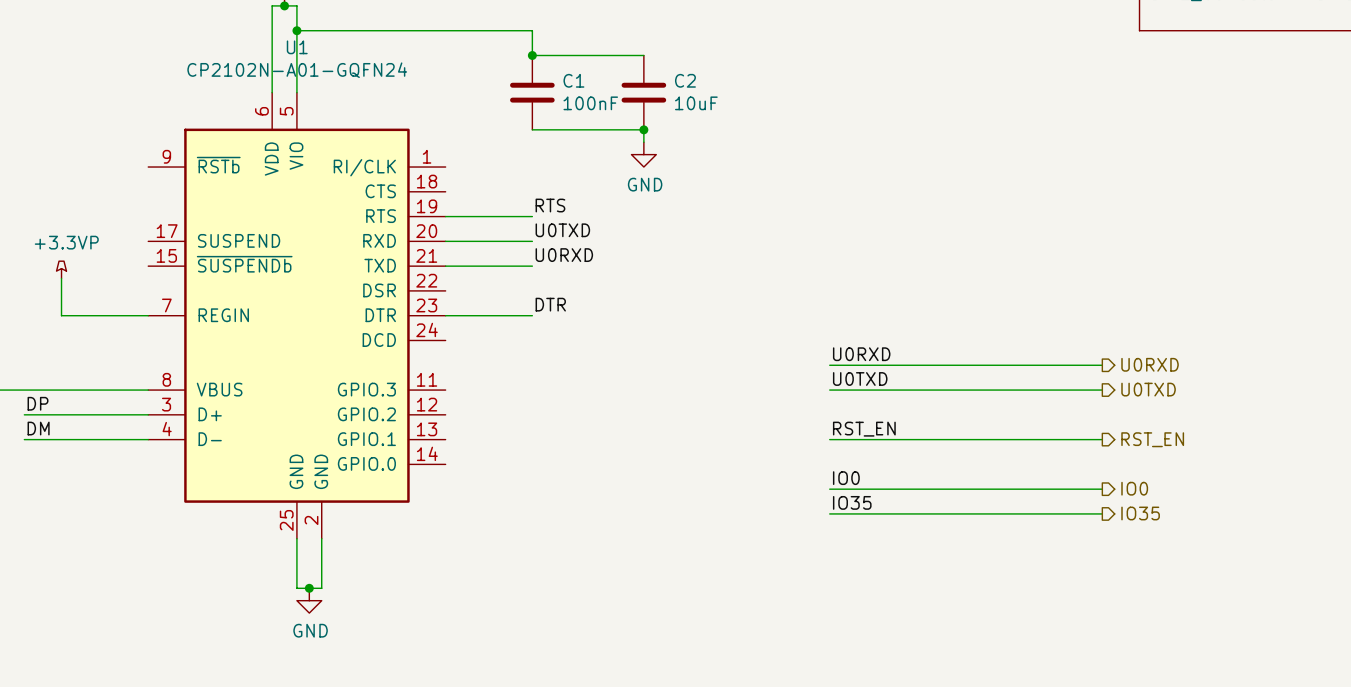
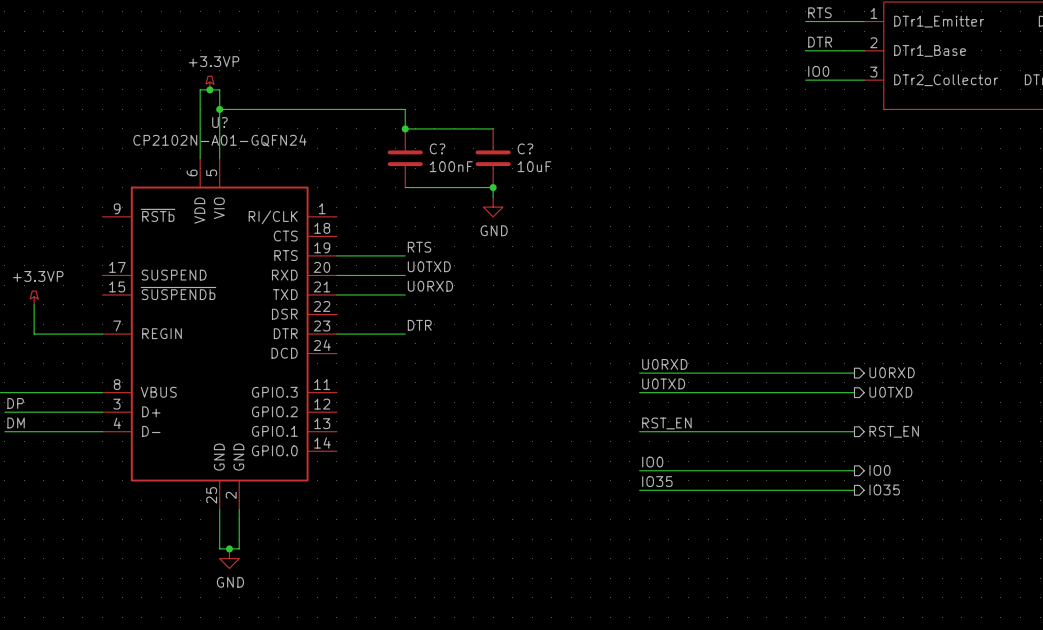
U1 name: U1 (297, 47) -> U? (219, 122)
C1 name: C1 (573, 80) -> C? (437, 148)
C2 name: C2 (685, 80) -> C? (525, 148)

